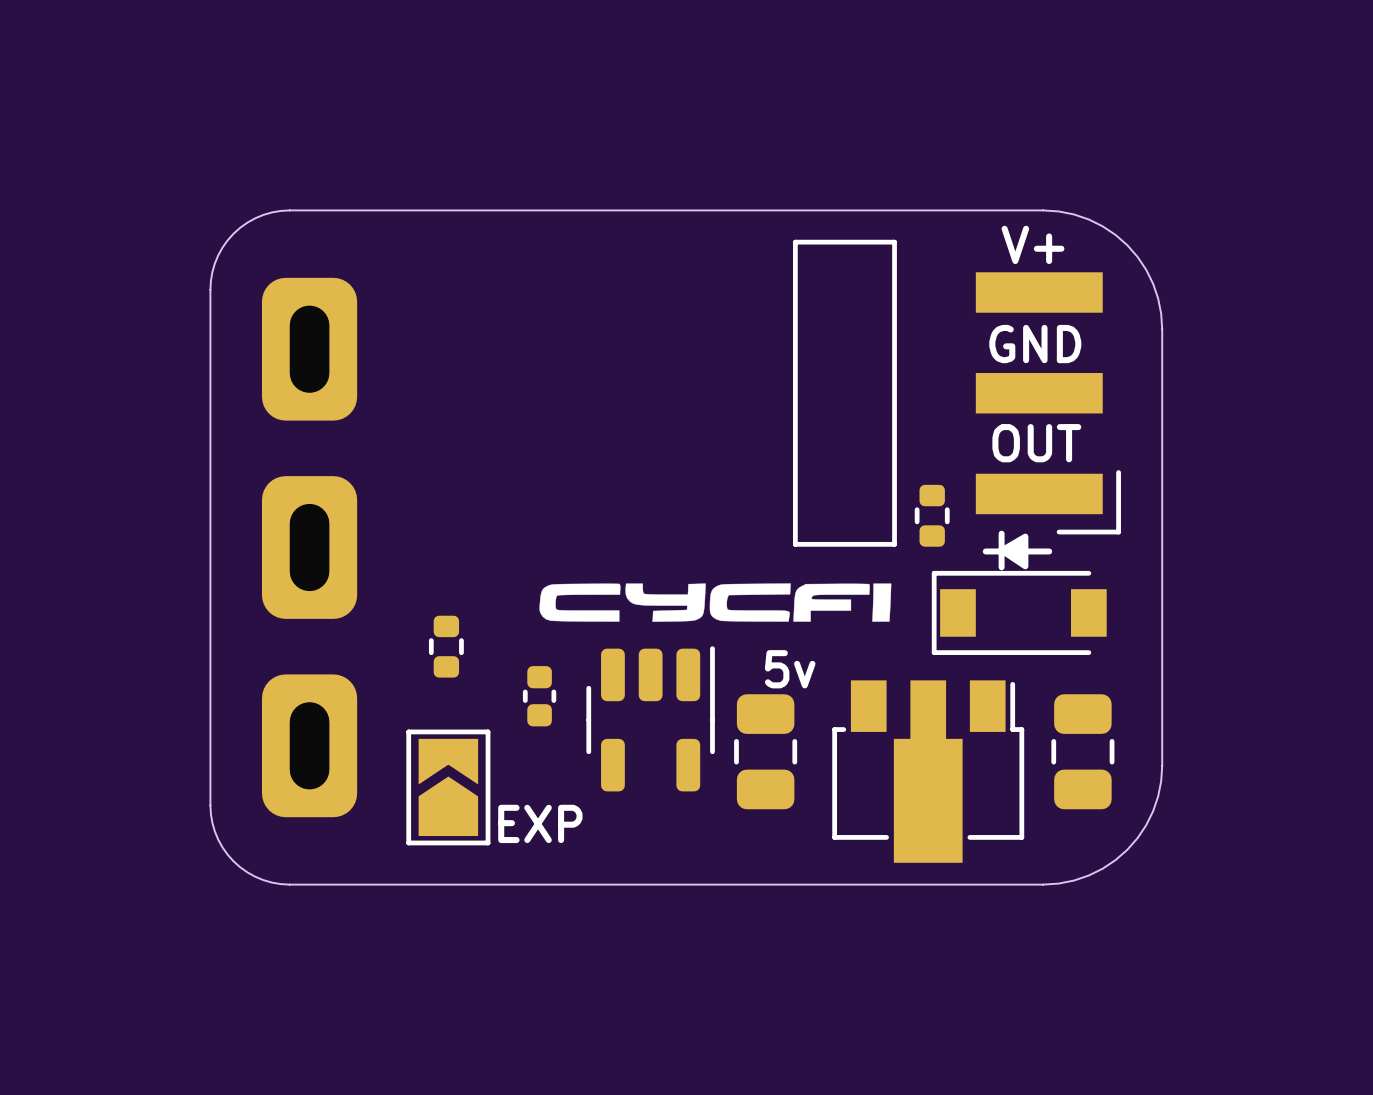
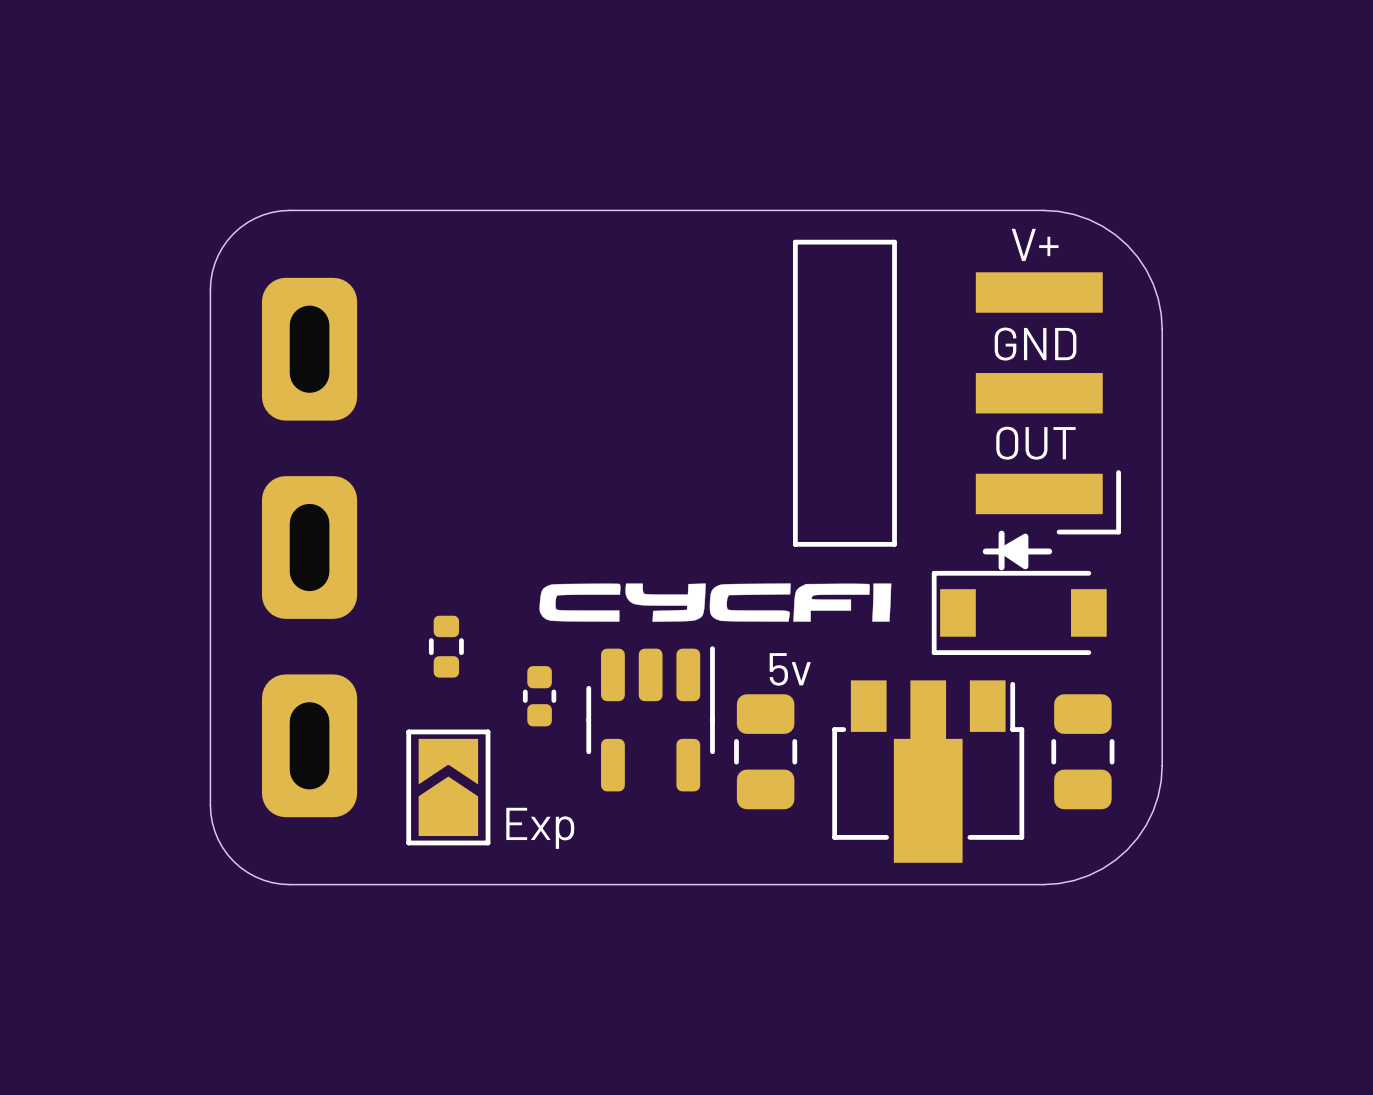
part: (932, 515) -> none
text: EXP (540, 823) -> Exp (540, 828)

